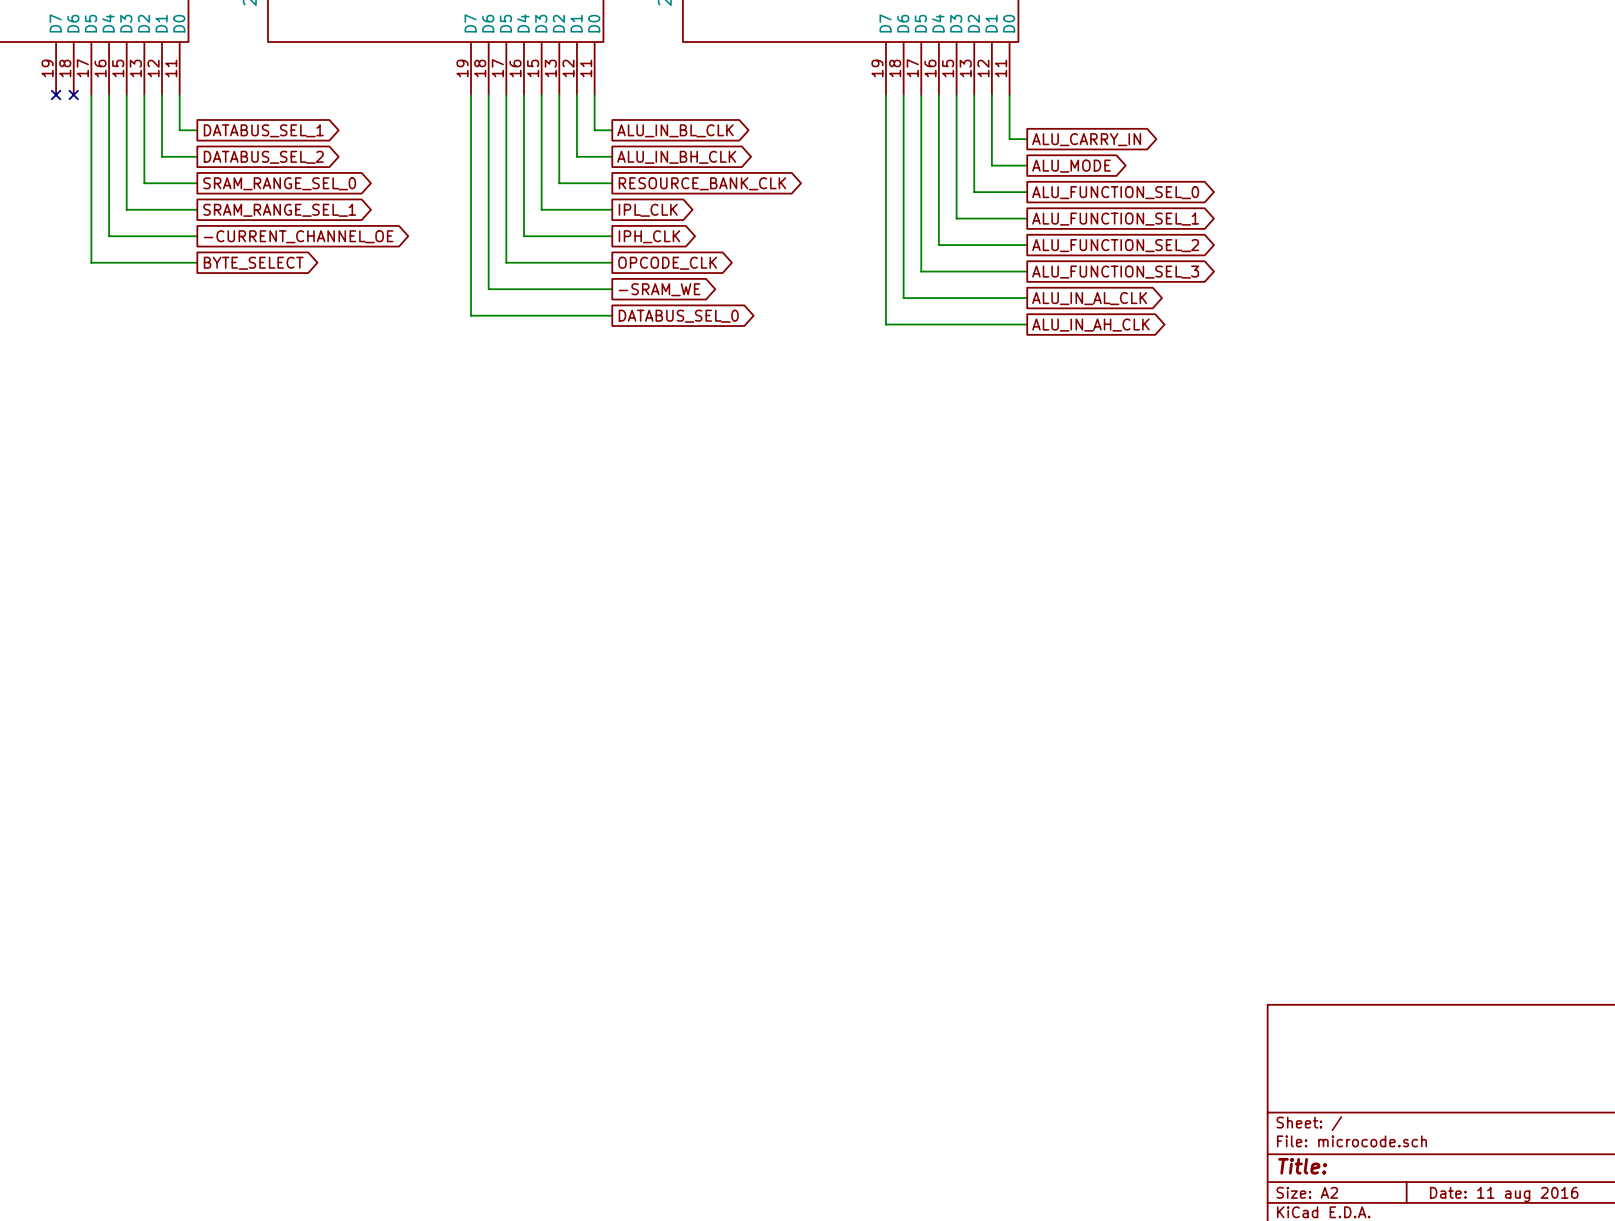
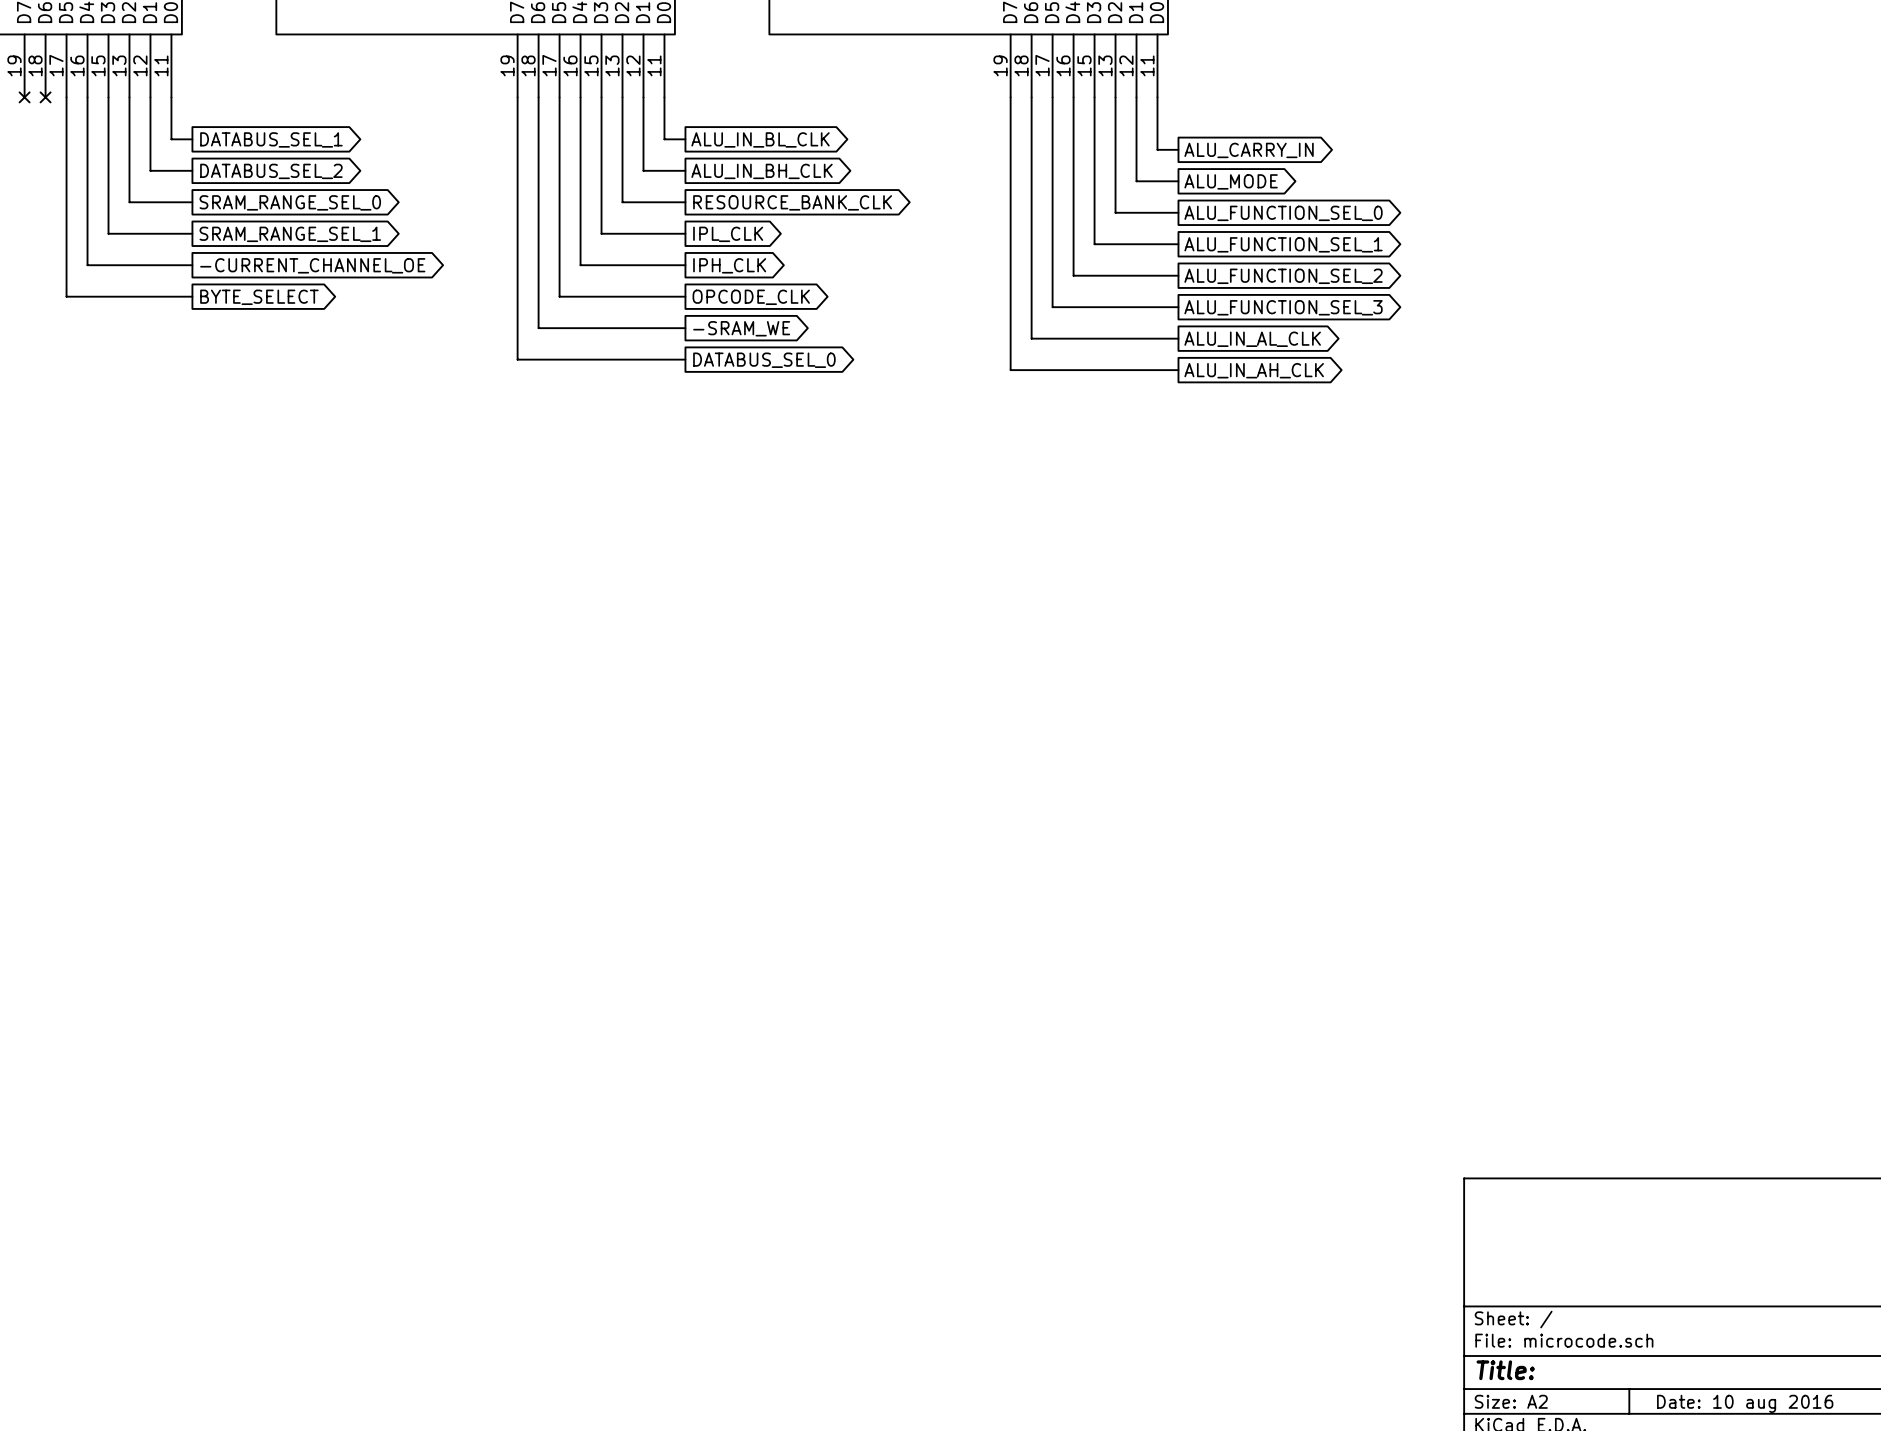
title block: Date: 11 aug 2016 (1504, 1194) -> Date: 10 aug 2016 (1745, 1403)

